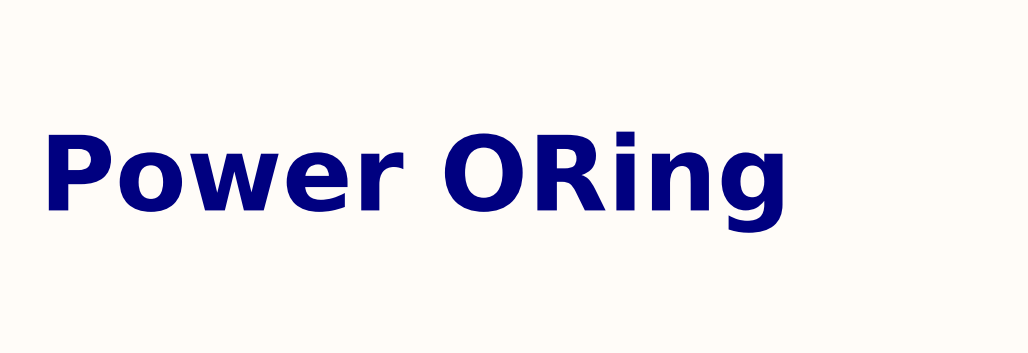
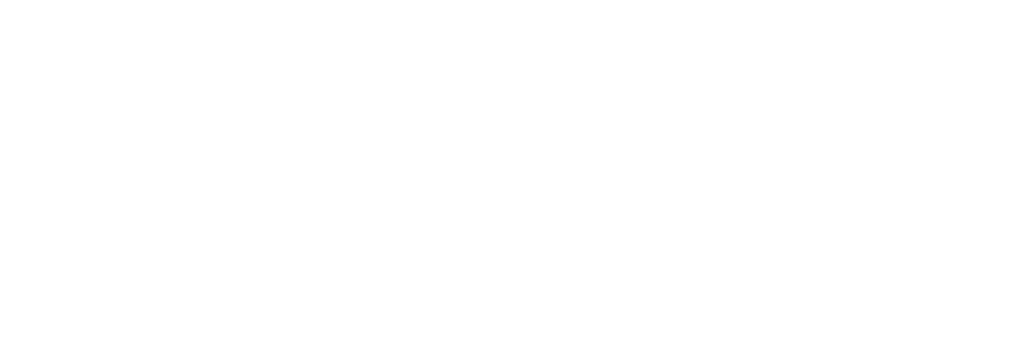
text: Power ORing (415, 182) -> none

